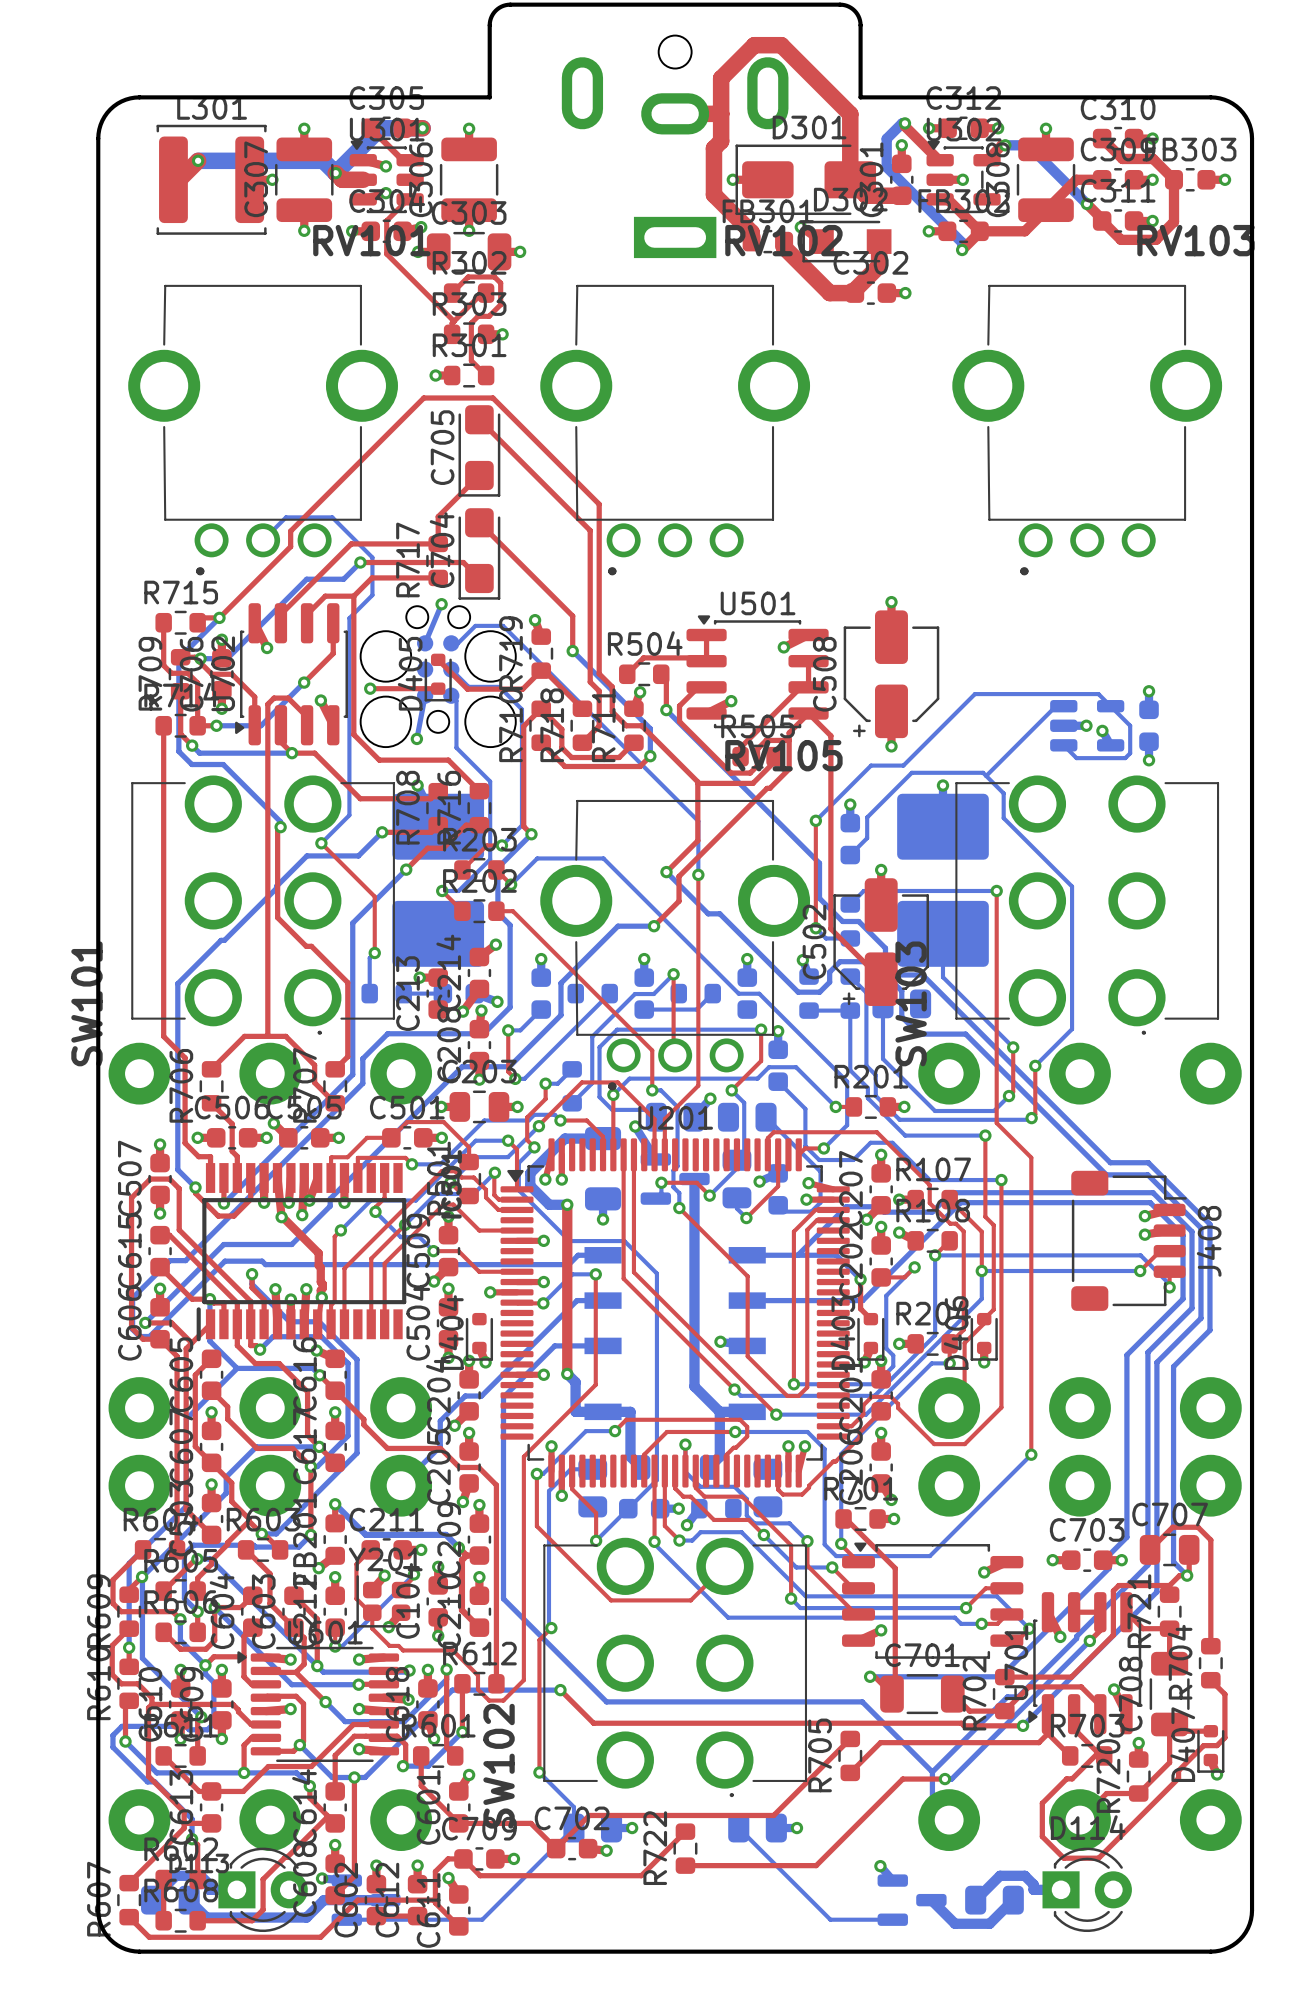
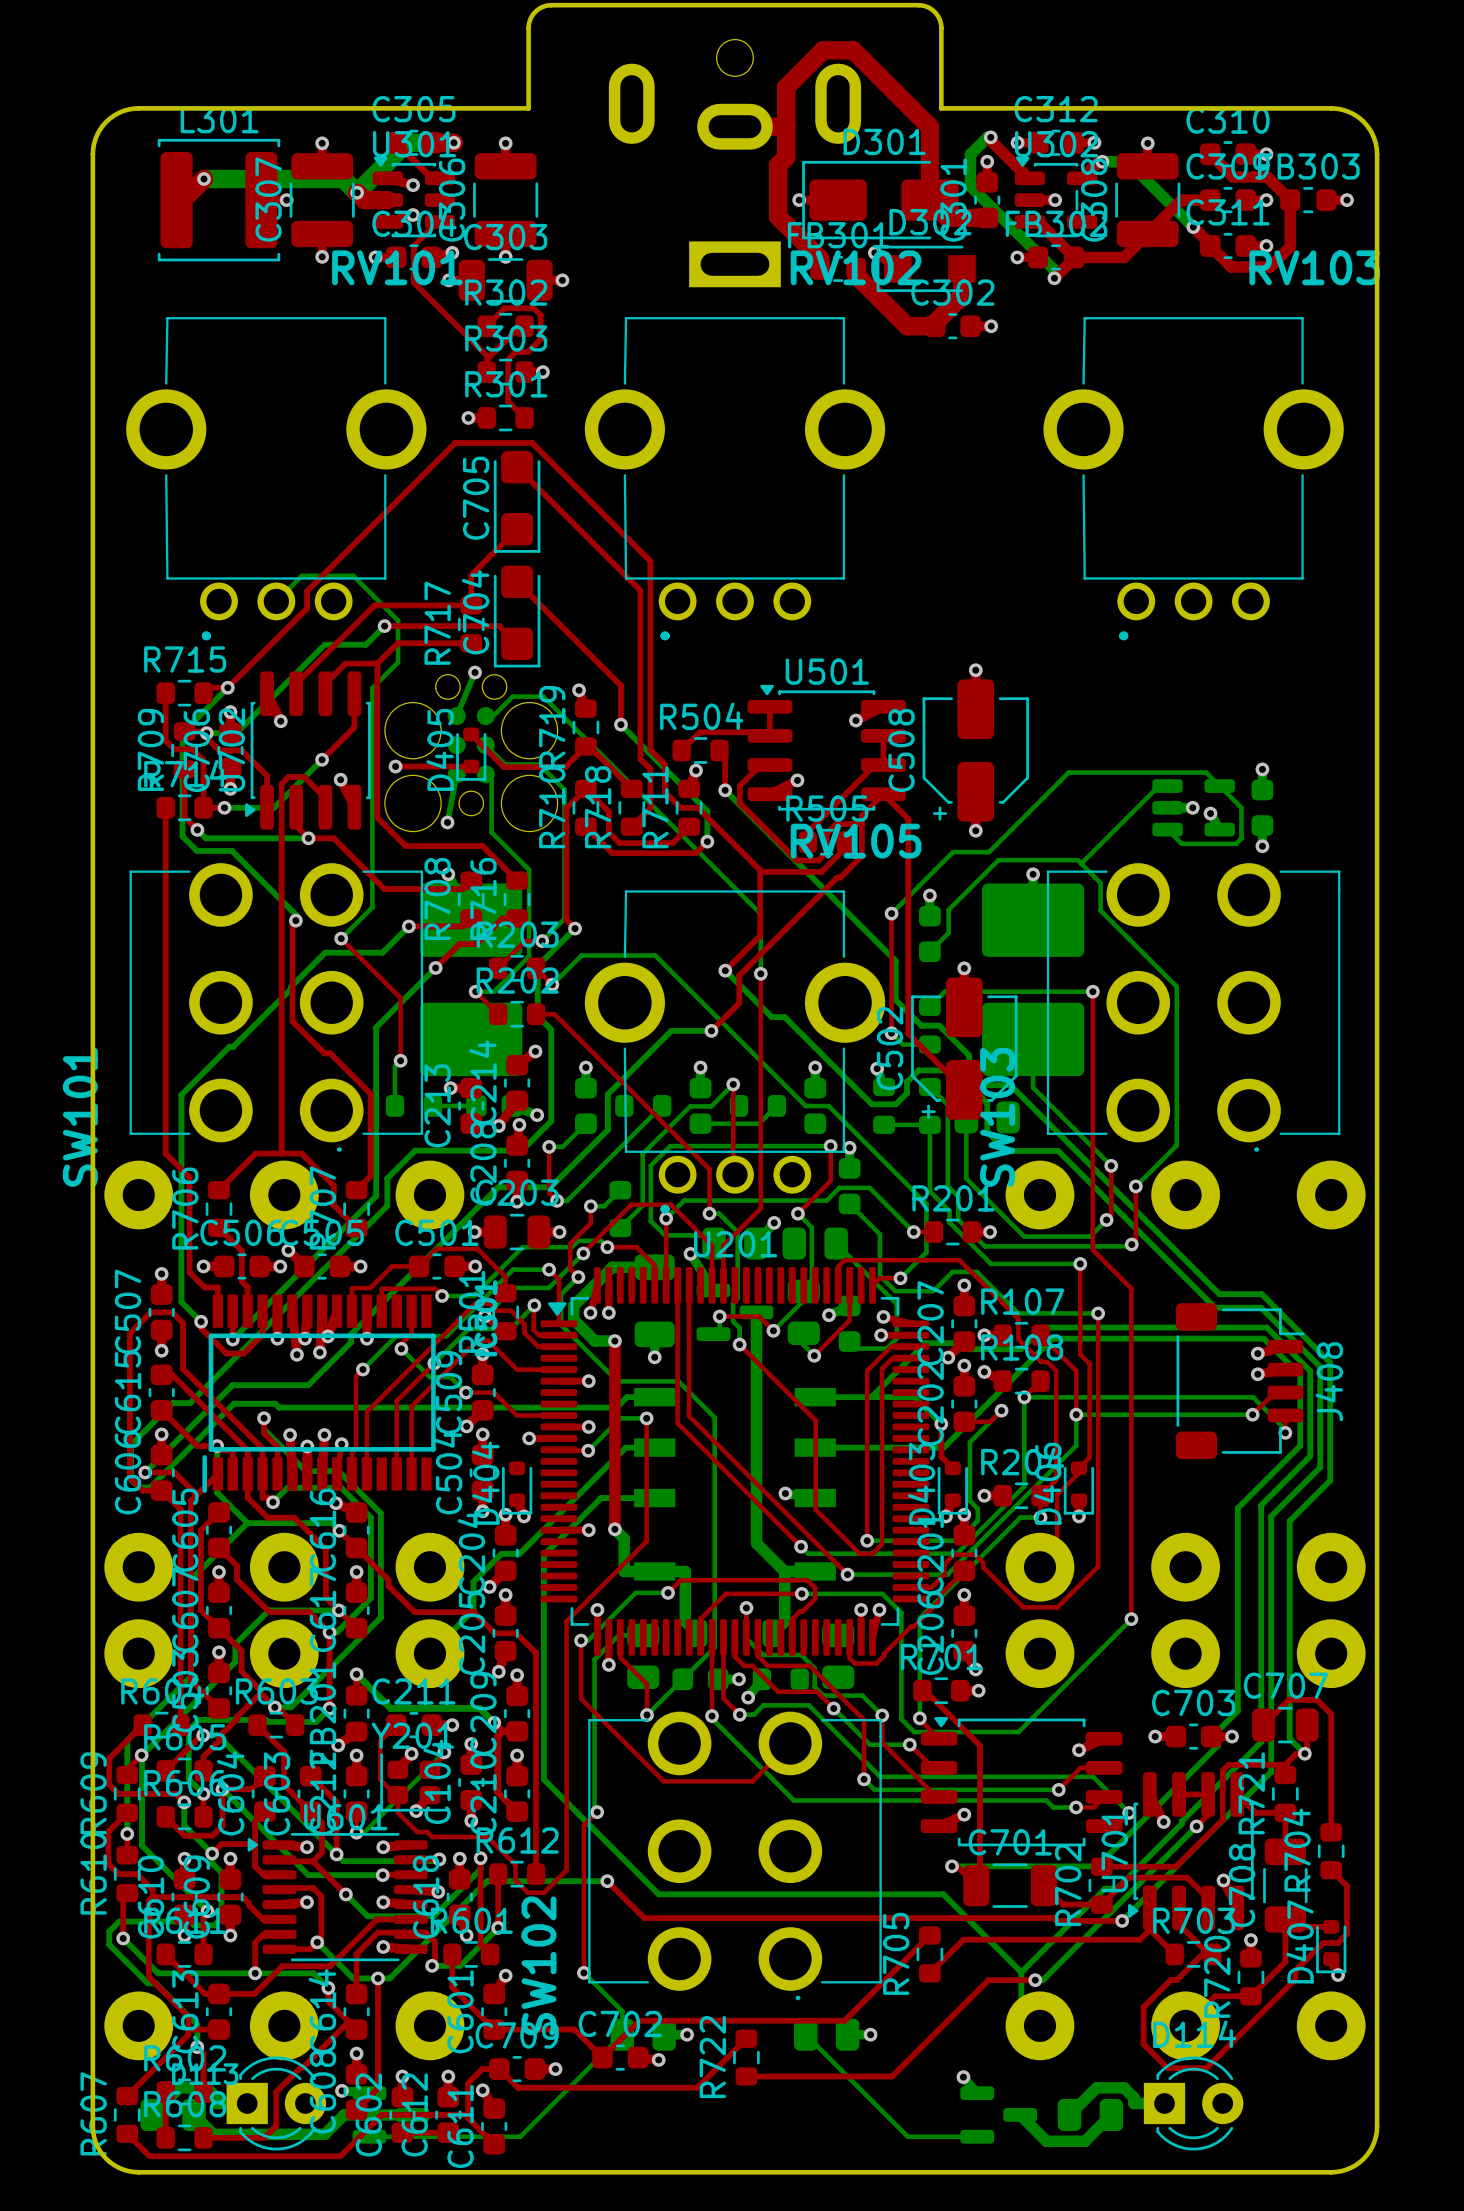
top track: (281, 1217) (318, 1253) (320, 1282) (322, 1284) (320, 1290) (321, 1297) -> none

